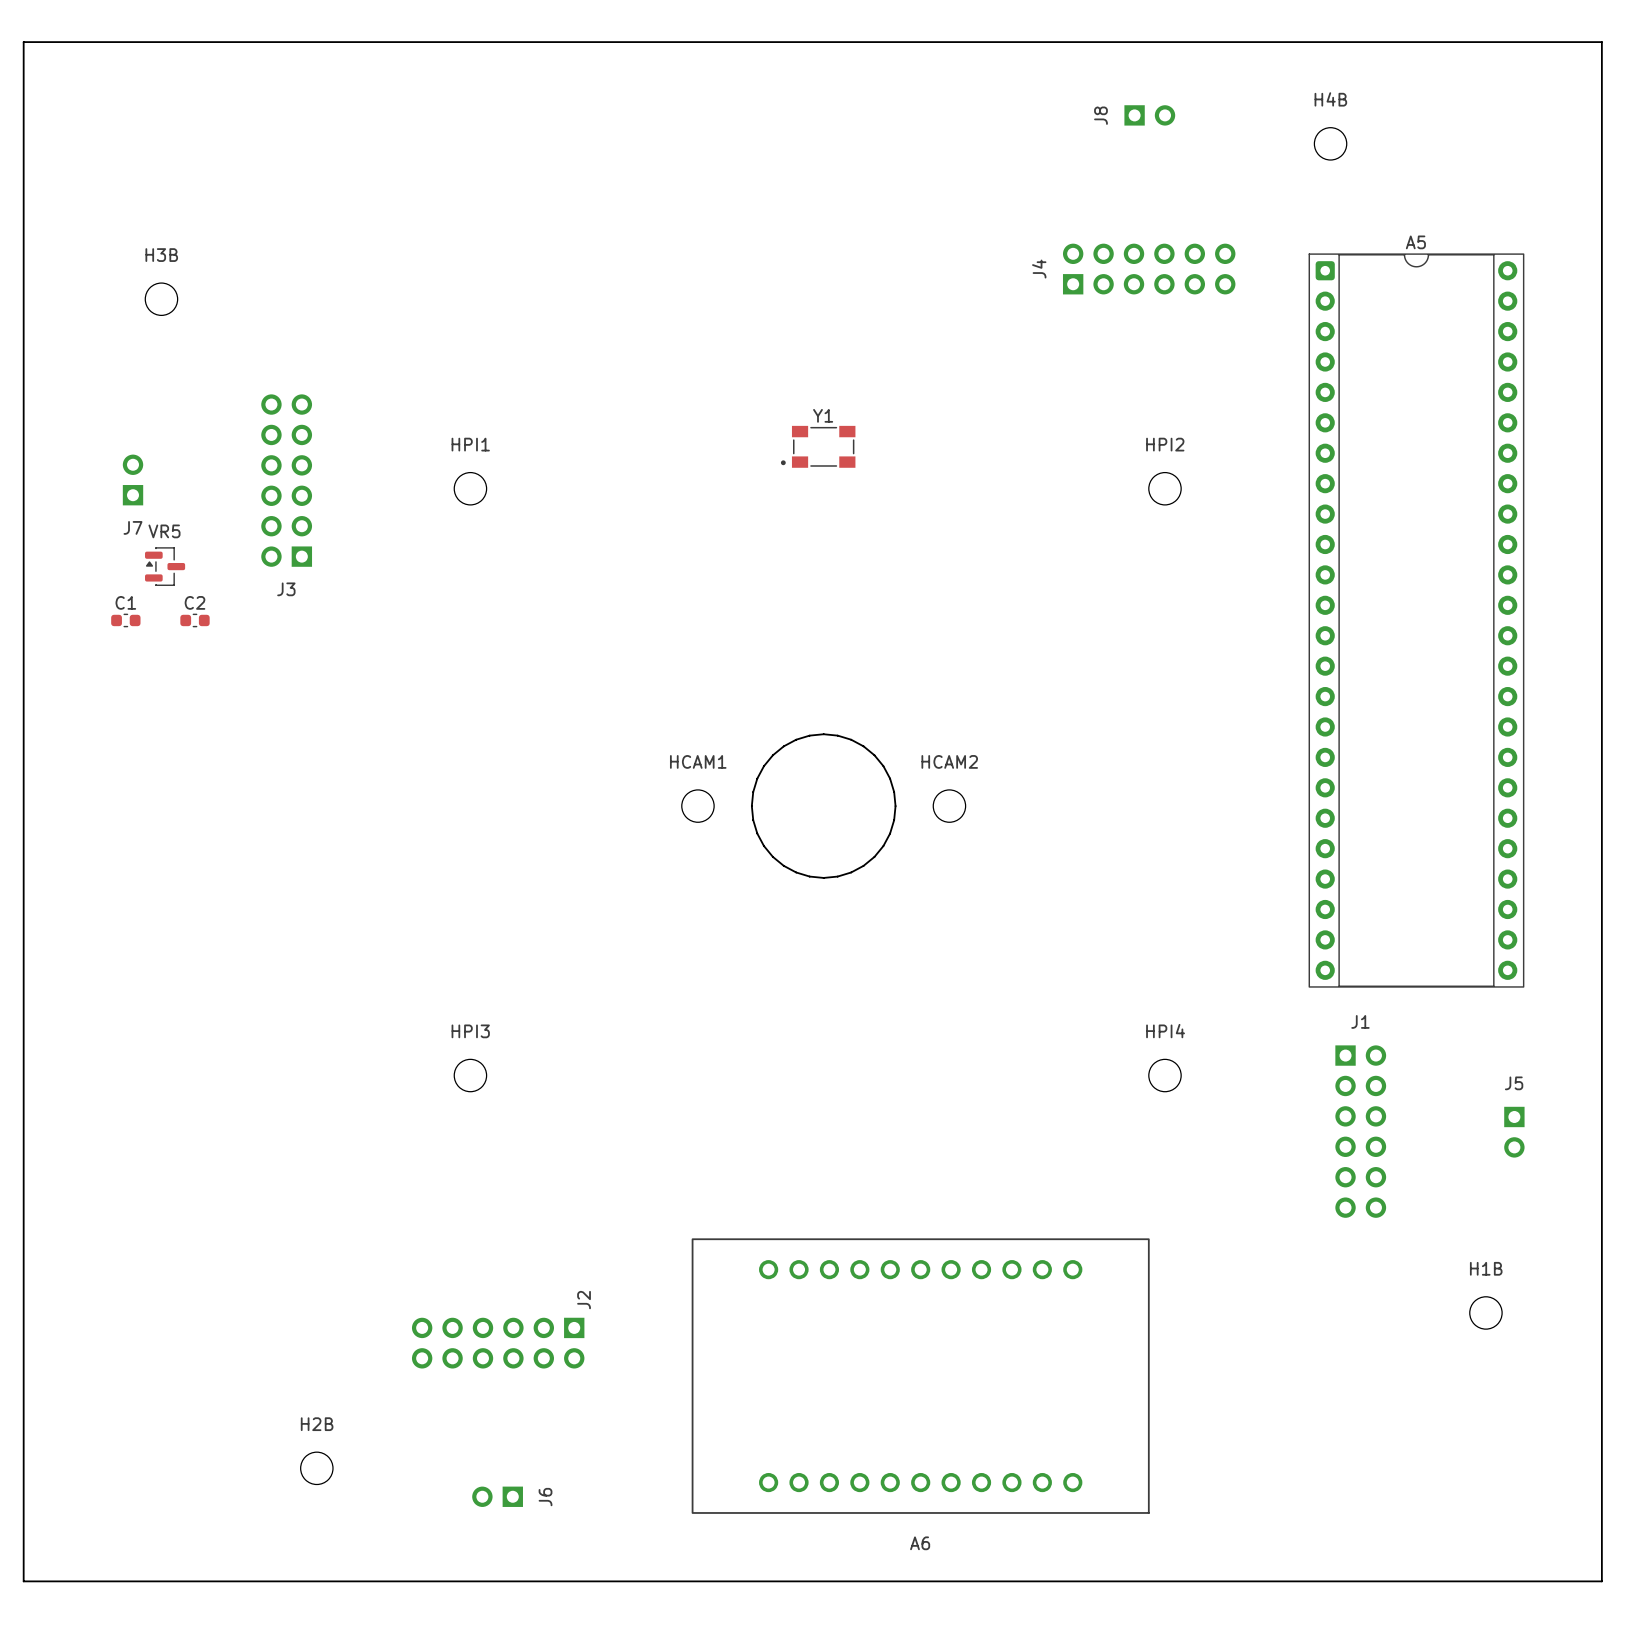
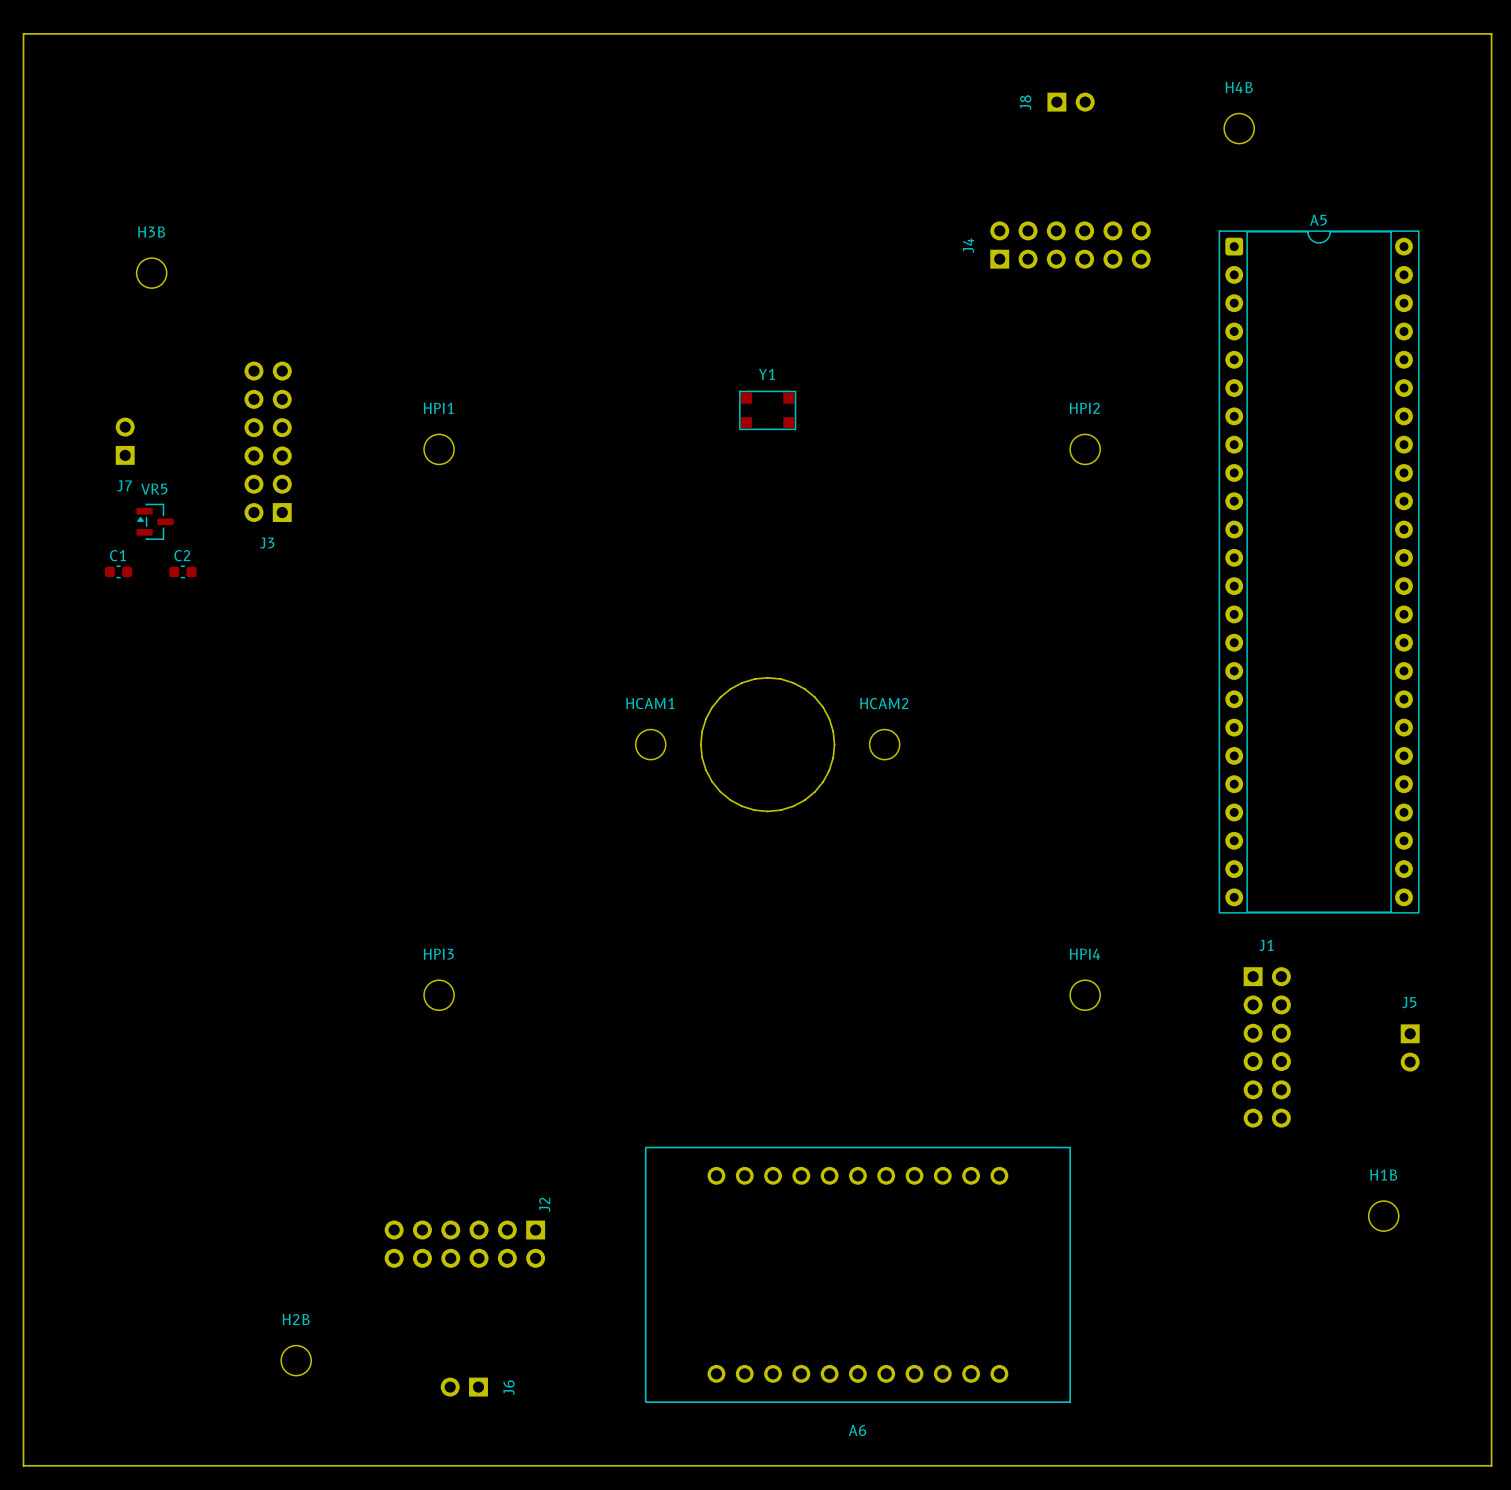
Y1 footprint: [780, 425, 856, 468] -> [739, 390, 797, 430]

